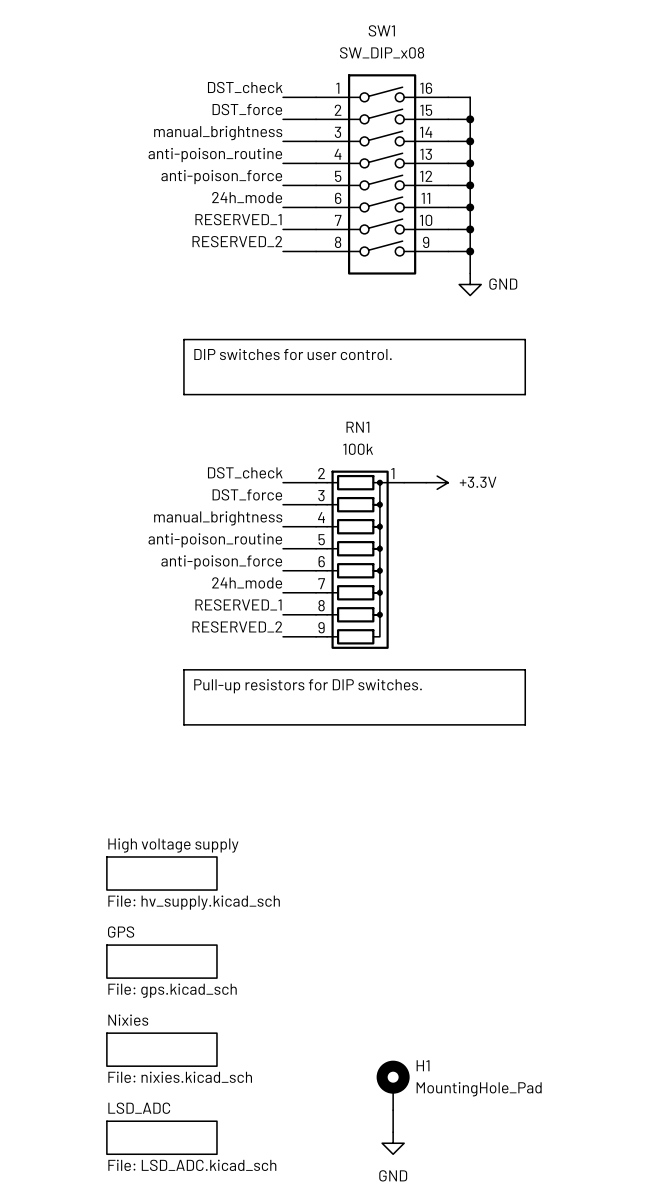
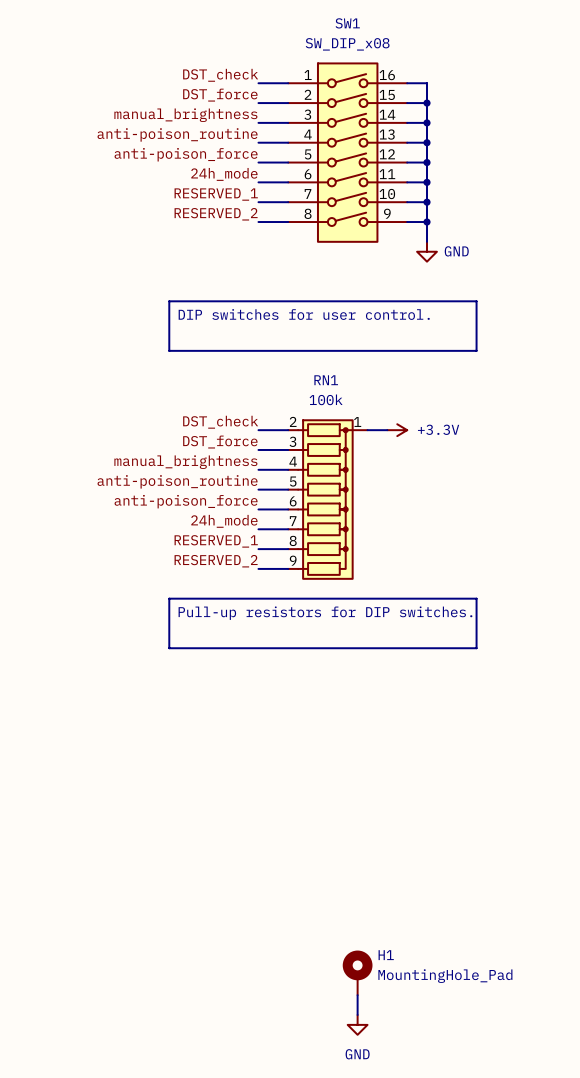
sheet High voltage supply: File: hv_supply.kicad_sch (161, 873) -> none
sheet GPS: File: gps.kicad_sch (161, 961) -> none
sheet Nixies: File: nixies.kicad_sch (161, 1049) -> none
sheet LSD_ADC: File: LSD_ADC.kicad_sch (161, 1137) -> none

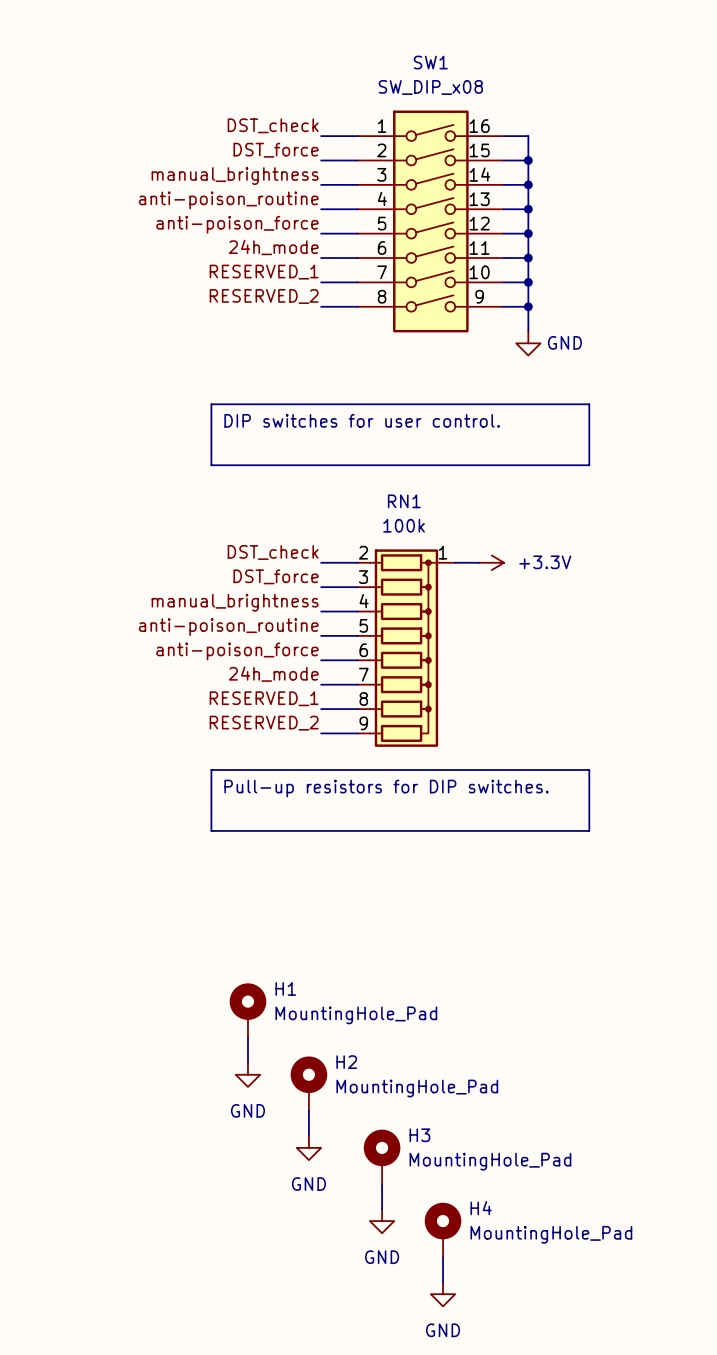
H1: none -> MountingHole_Pad (247, 1010)
wire: none -> (247, 1038) (247, 1062)
power symbol: none -> GND (247, 1074)
H2: none -> MountingHole_Pad (308, 1083)
wire: none -> (308, 1111) (308, 1135)
power symbol: none -> GND (308, 1147)
H3: none -> MountingHole_Pad (382, 1157)
wire: none -> (382, 1184) (382, 1208)
H1 name: H1 (386, 955) -> H4 (481, 1208)
power symbol: none -> GND (382, 1221)

